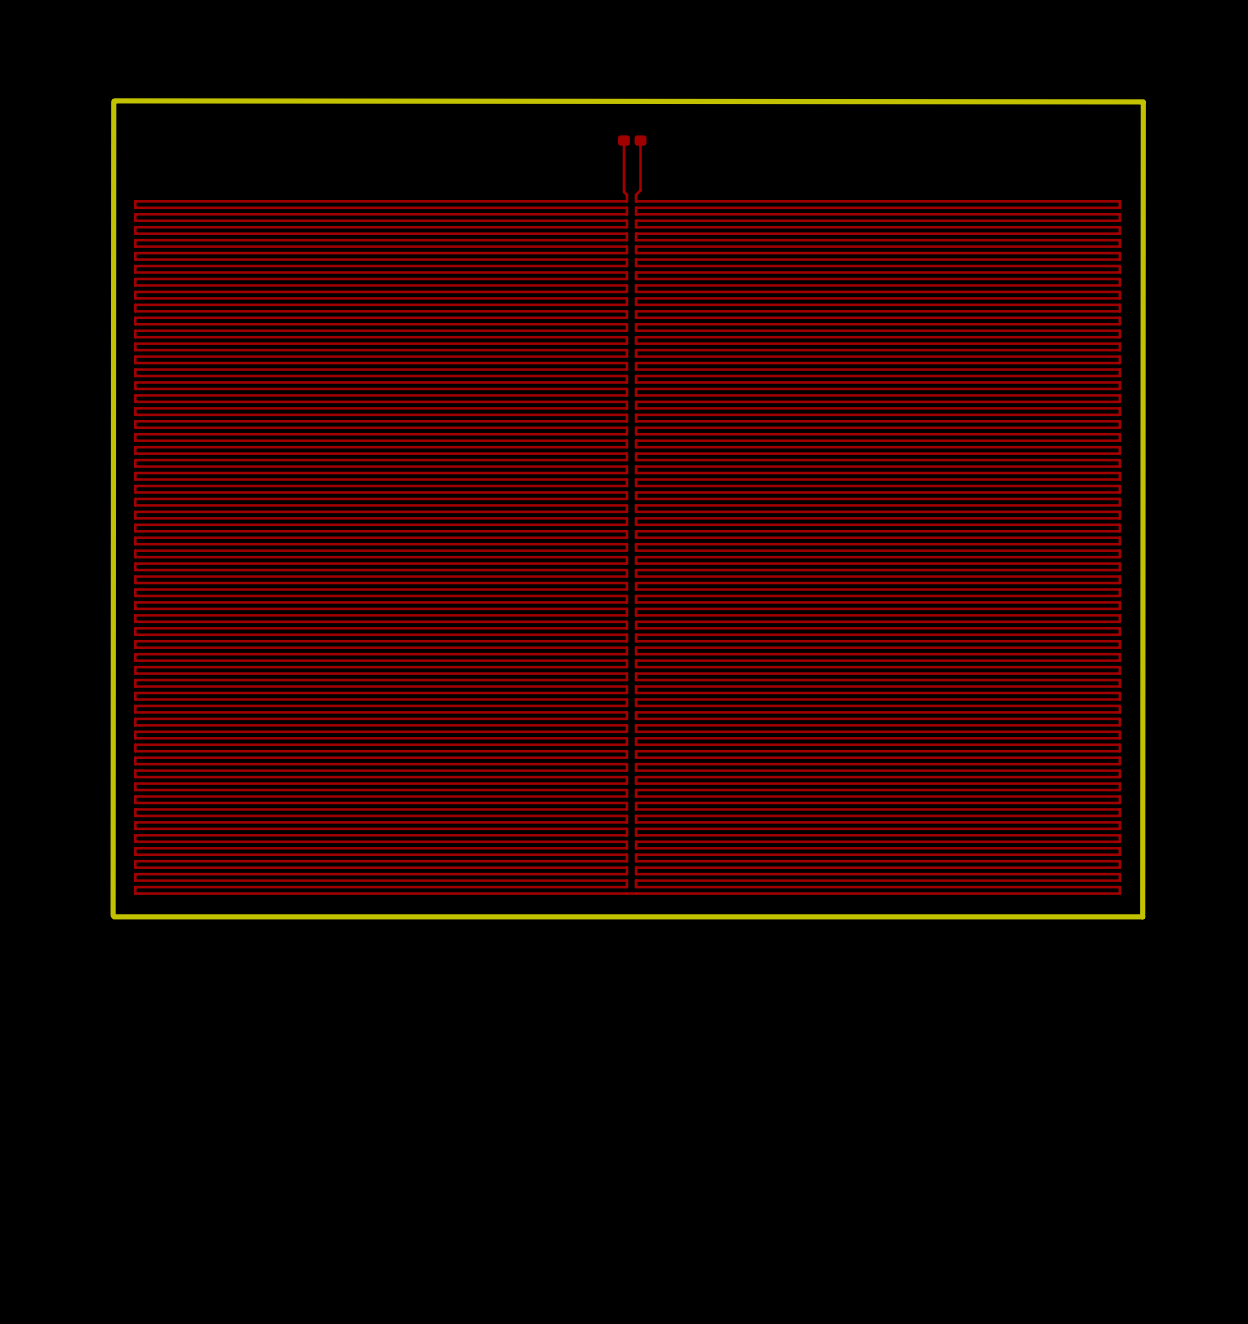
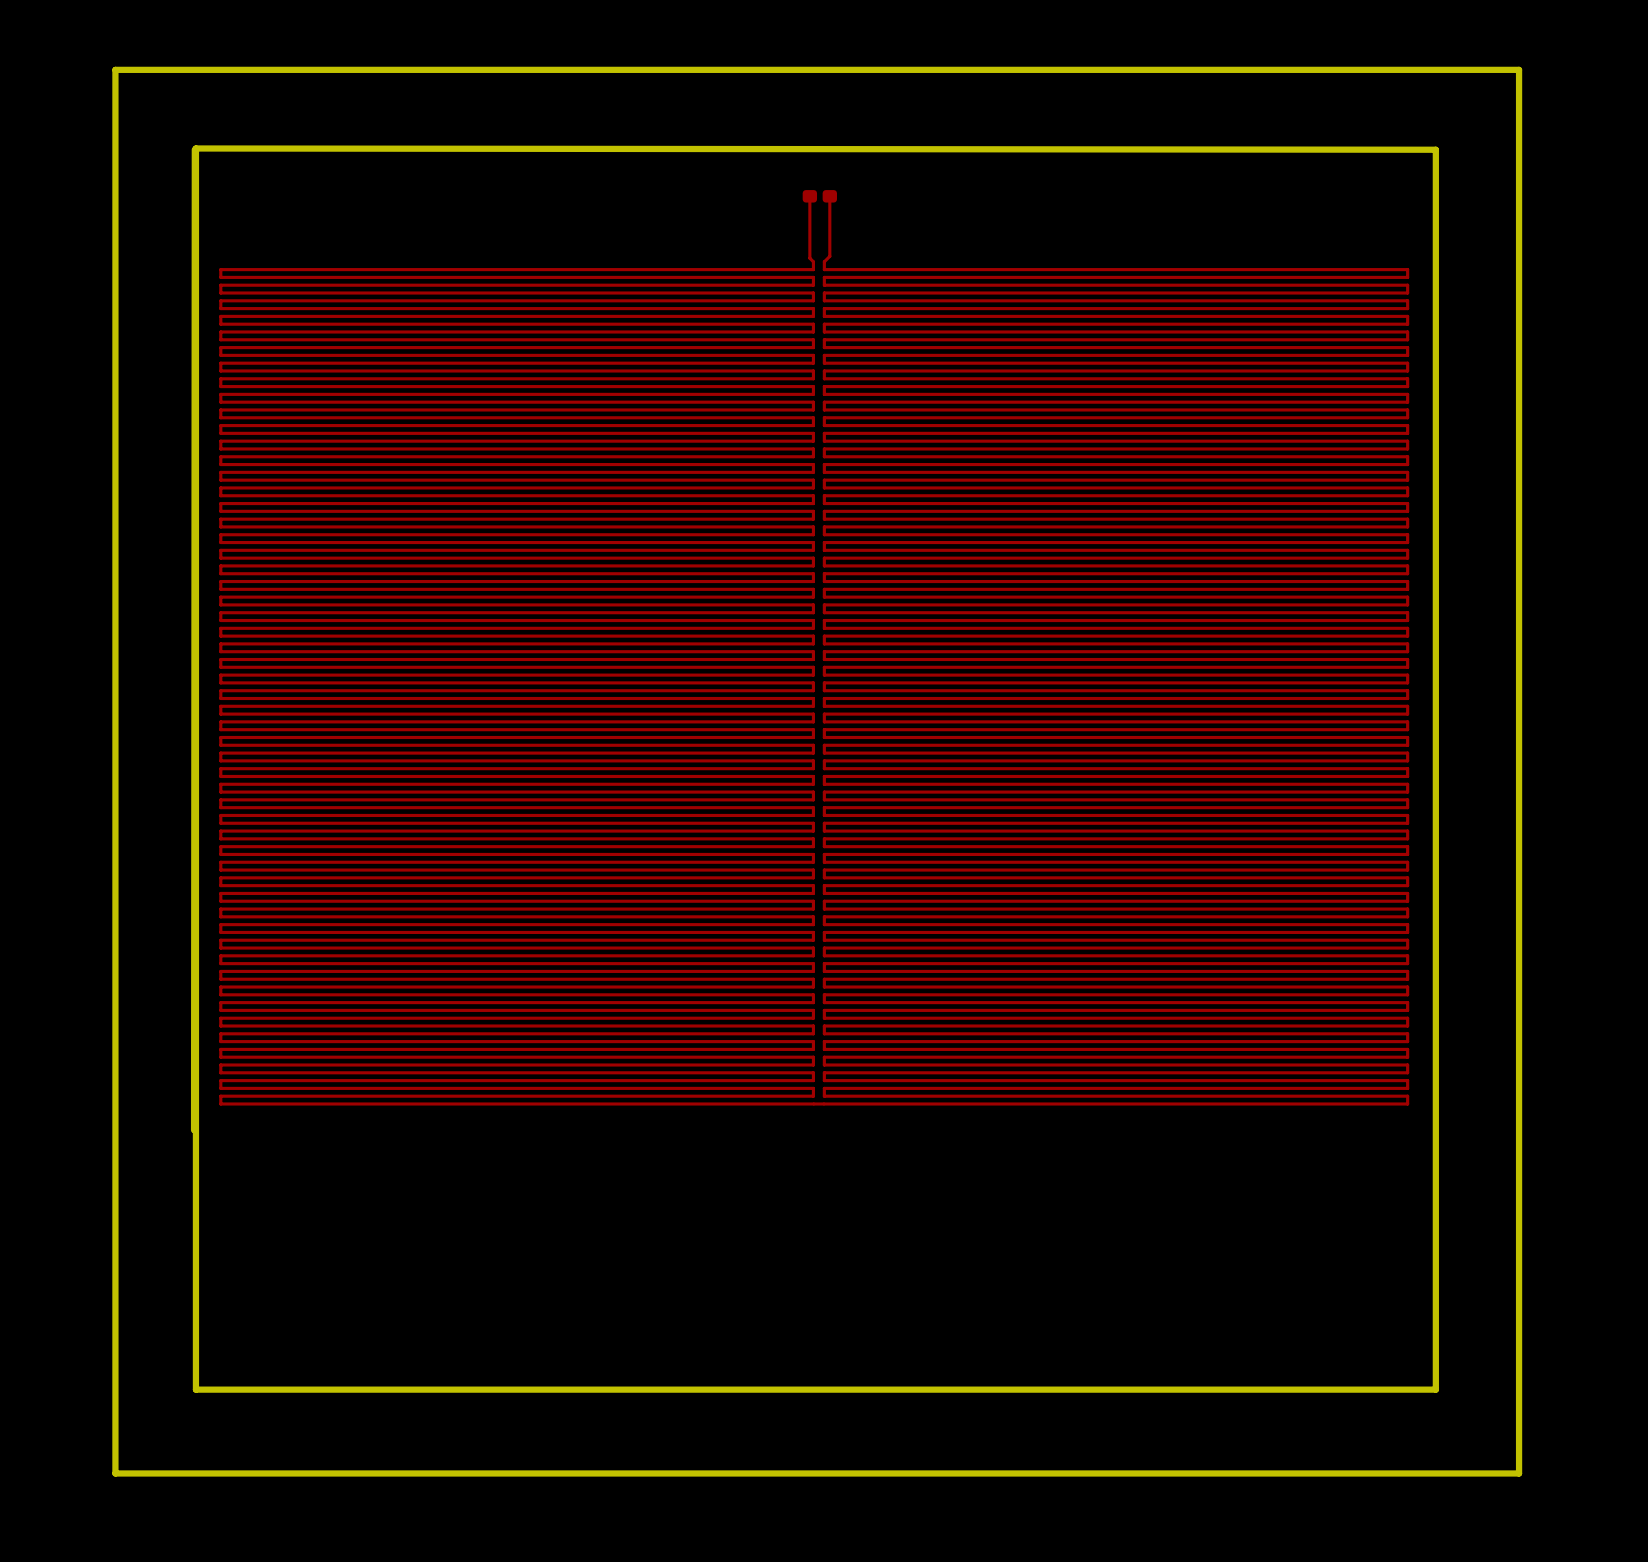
board edge: none -> (115, 69) (1519, 69) (1519, 1473) (115, 1473) (115, 69)
board edge: none -> (195, 148) (195, 1389) (1435, 1389) (1435, 149)
board edge: (1143, 103) (1142, 916) (114, 916) -> none

